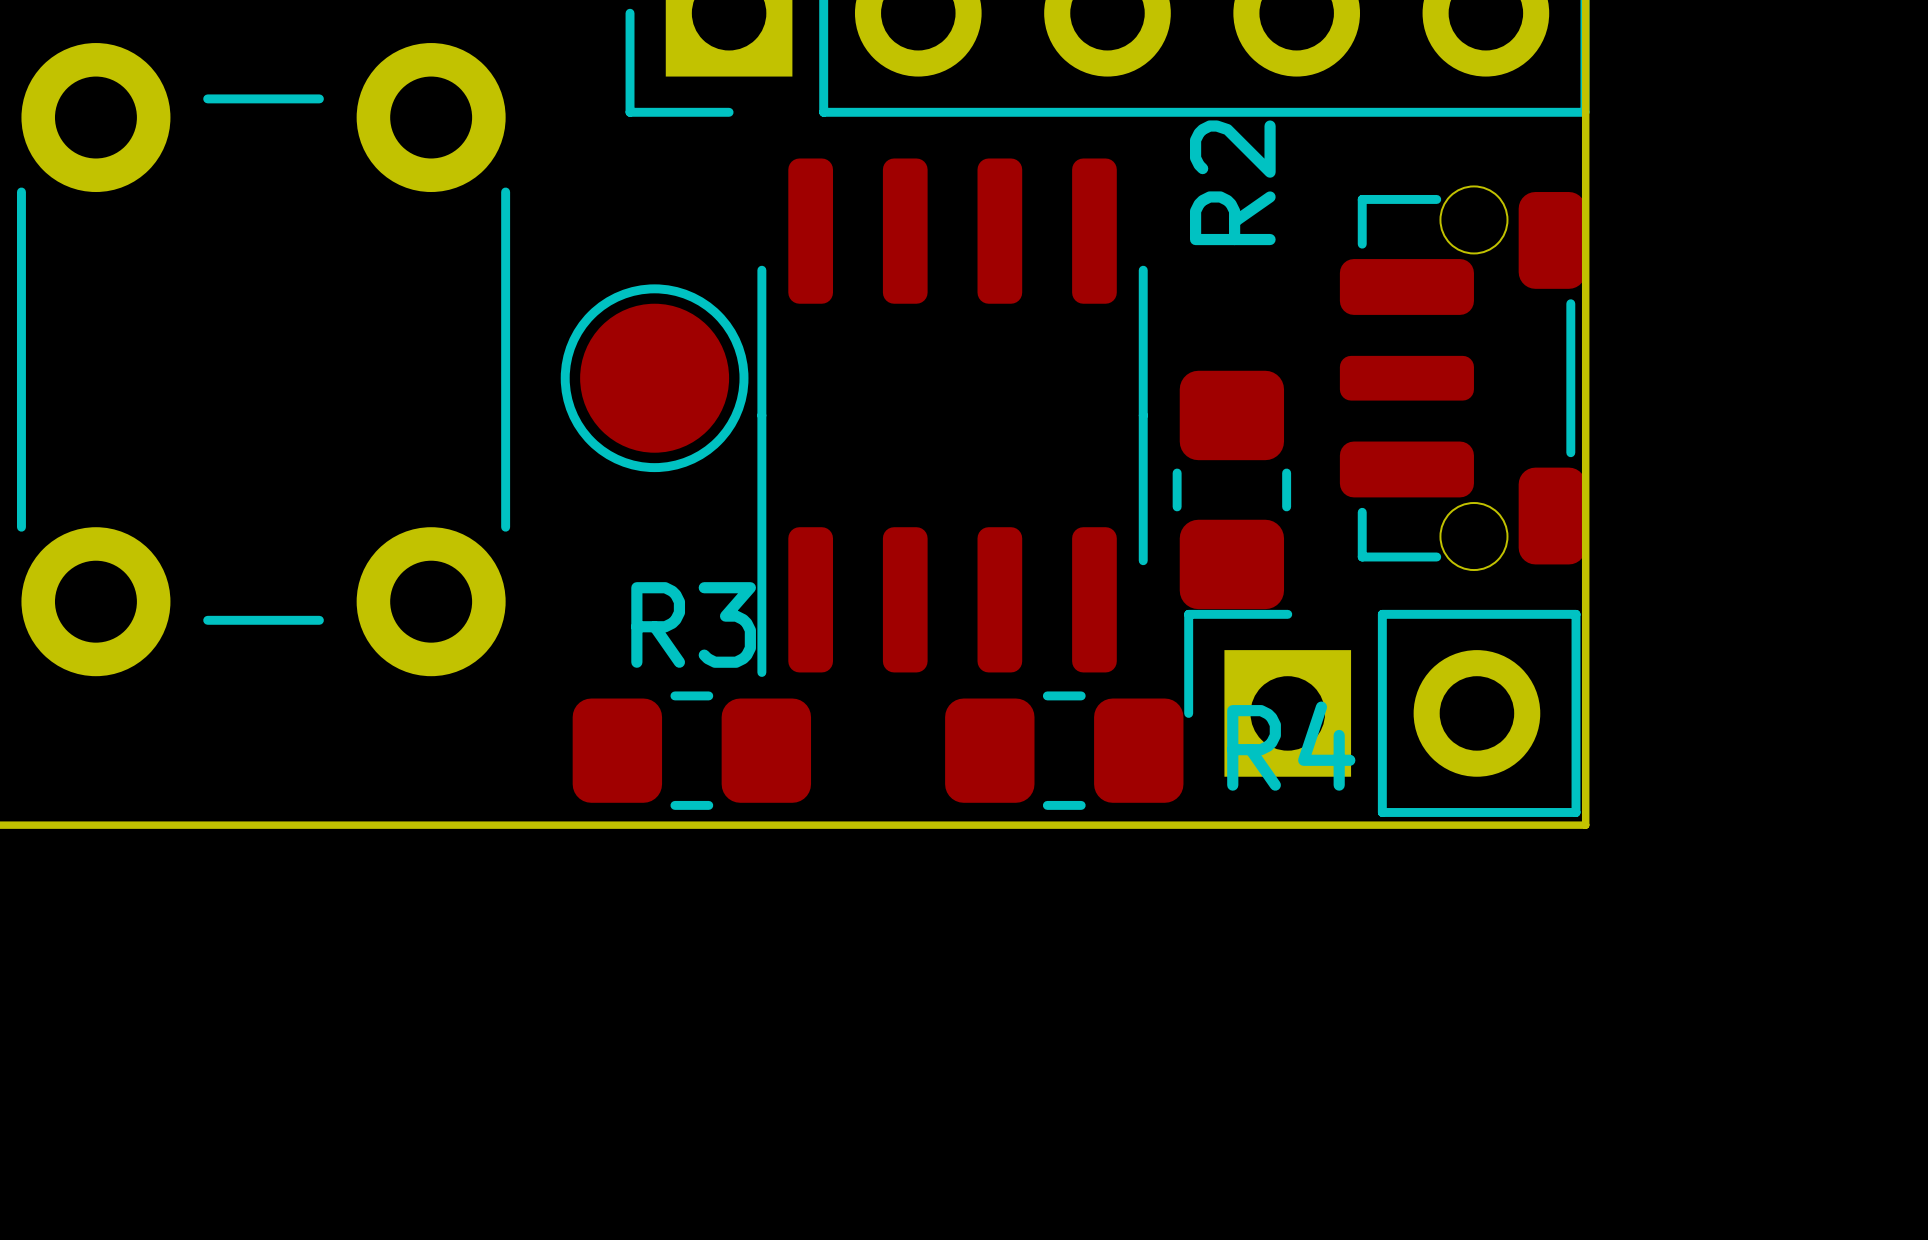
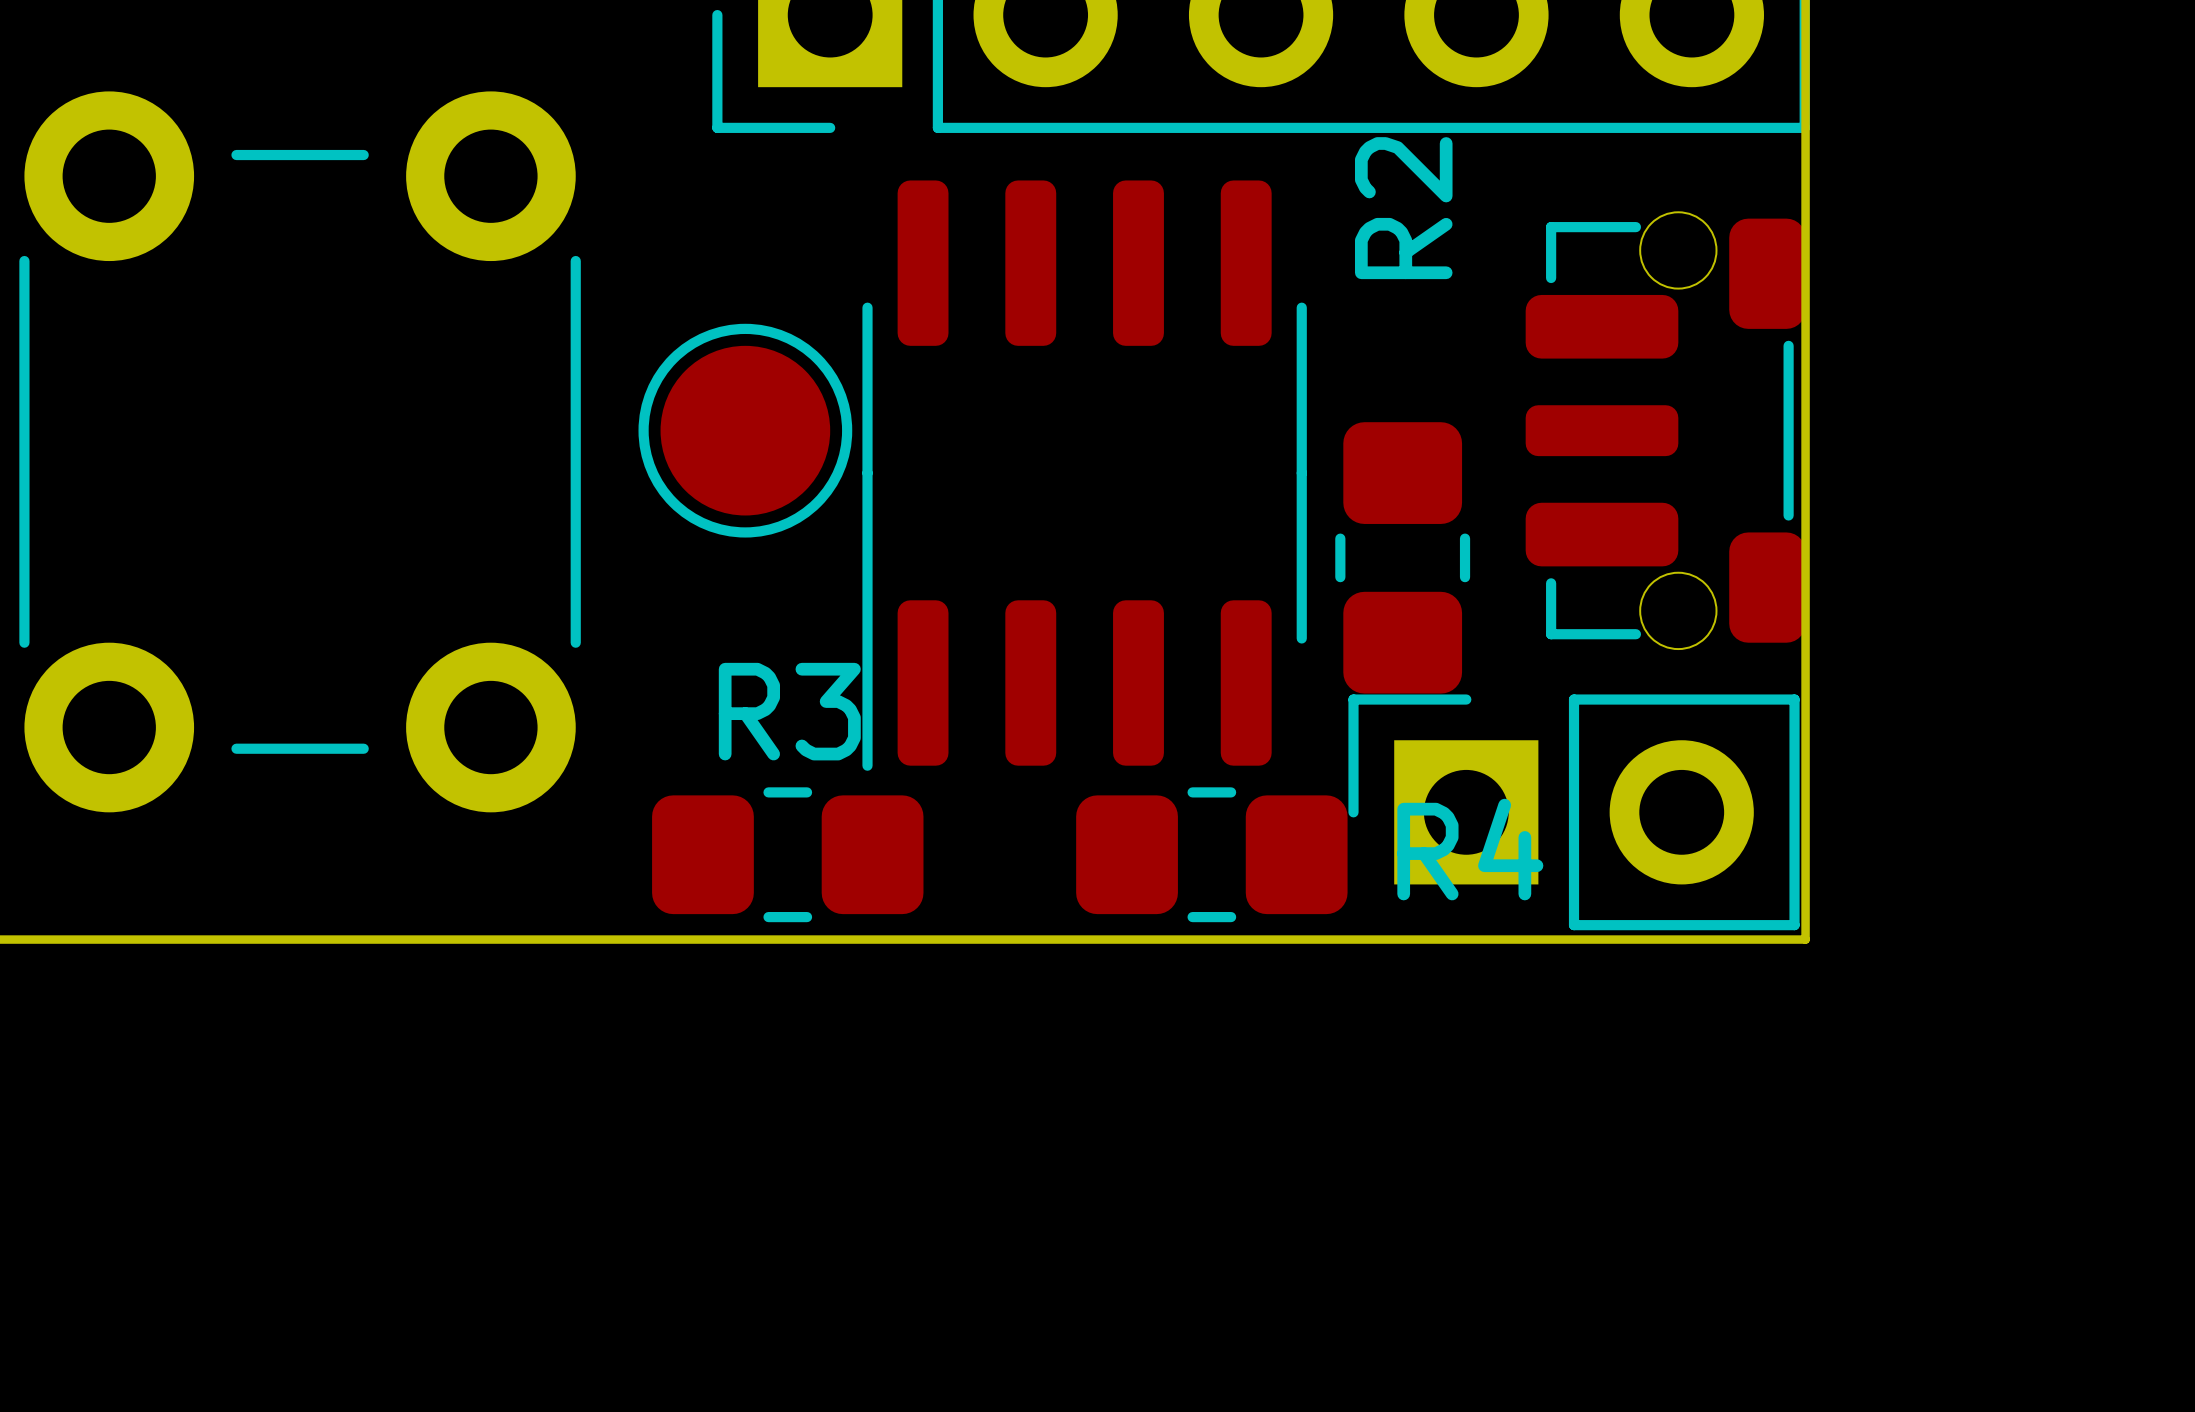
part position: (263, 359) -> (300, 451)

